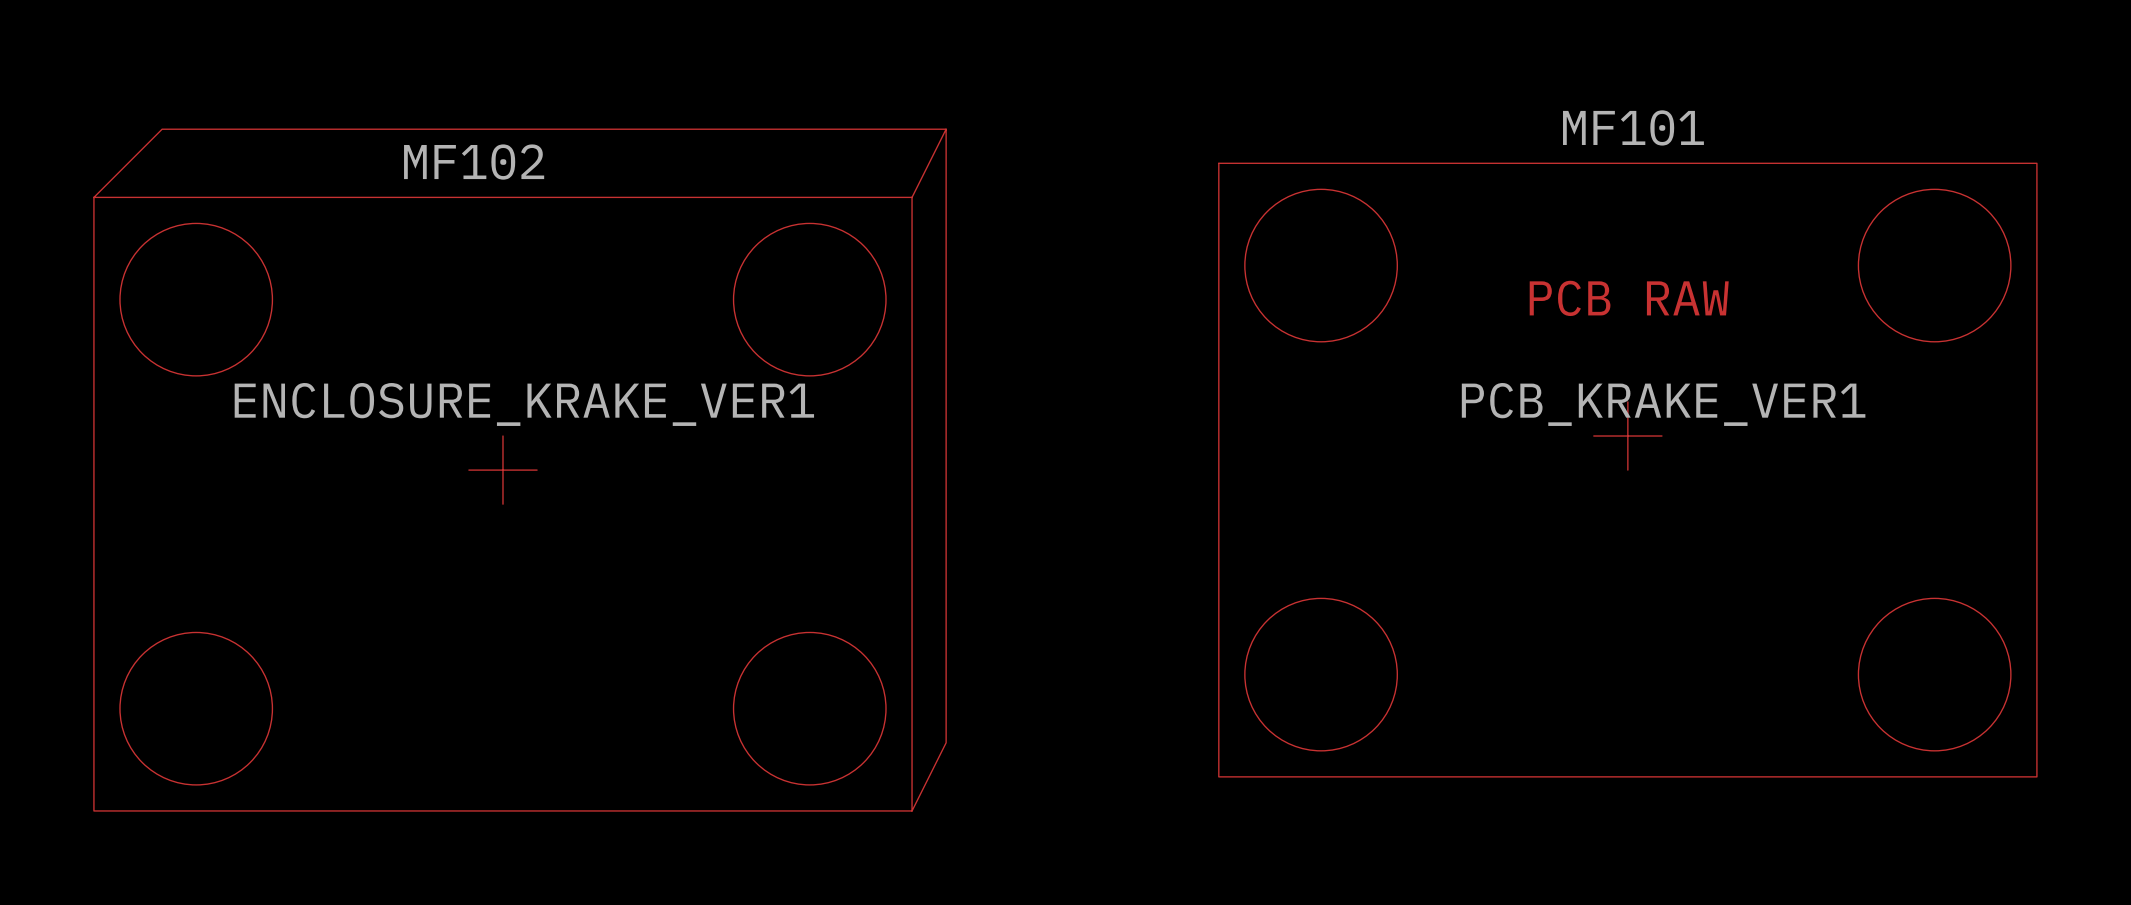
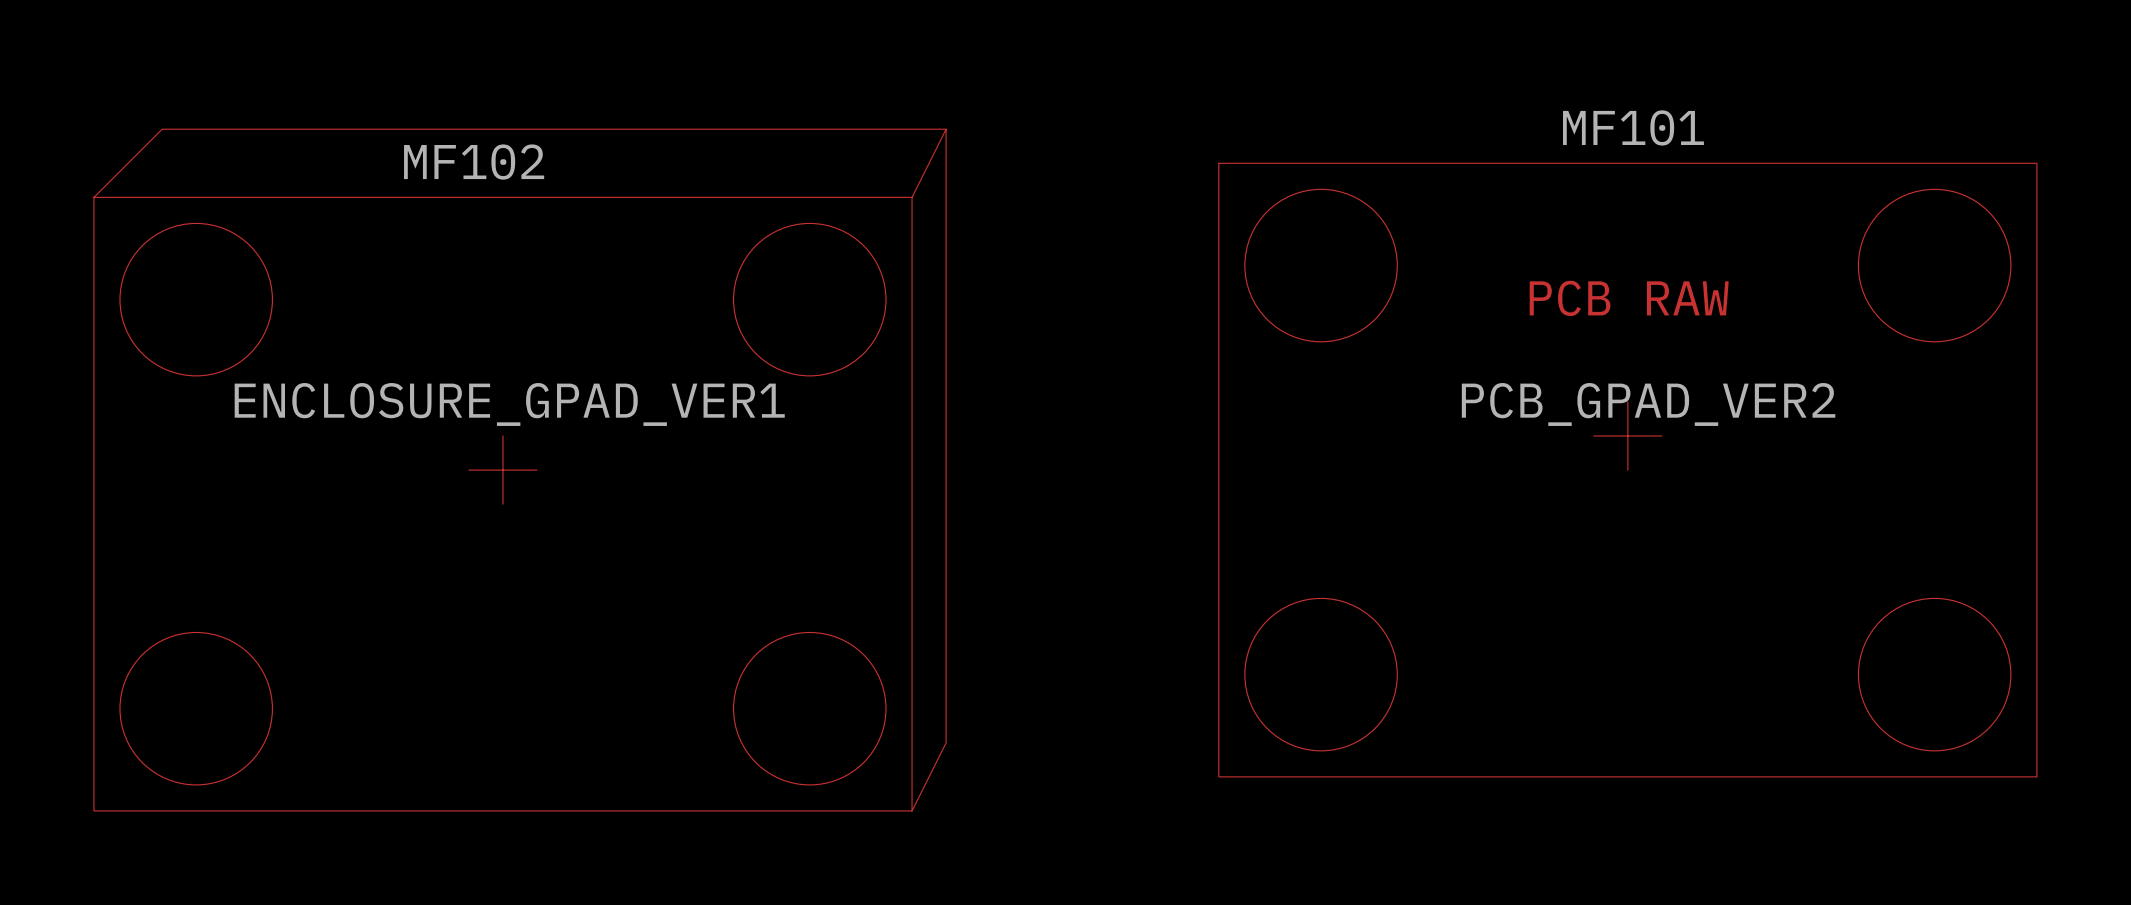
MF102 value: ENCLOSURE_KRAKE_VER1 (524, 404) -> ENCLOSURE_GPAD_VER1 (509, 404)
MF101 value: PCB_KRAKE_VER1 (1663, 404) -> PCB_GPAD_VER2 (1648, 404)

